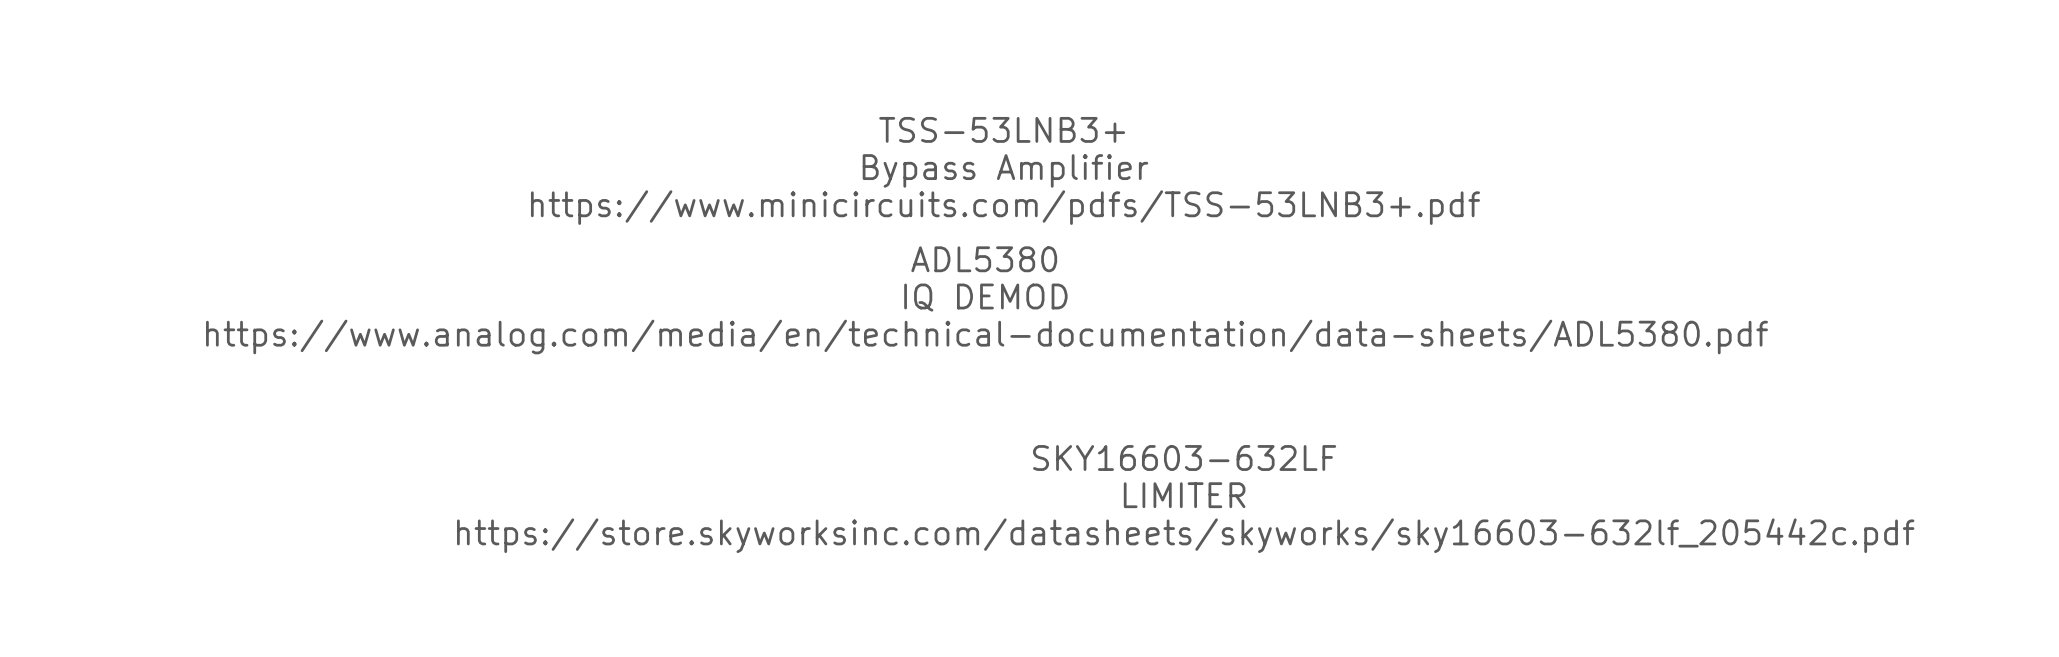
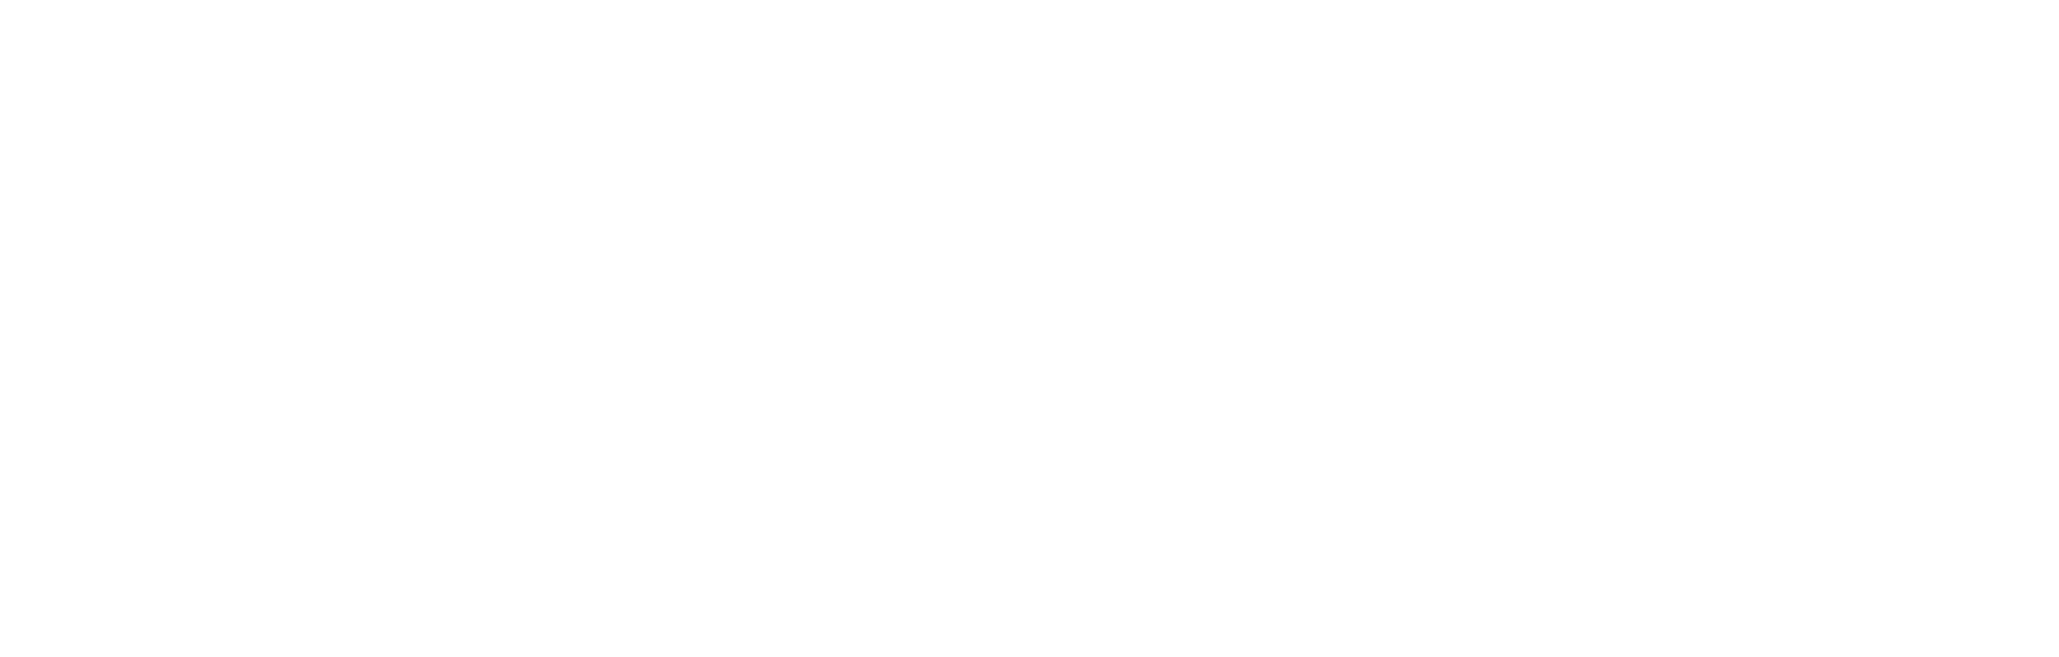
text: TSS-53LNB3+ (1002, 129) -> none
text: Bypass Amplifier (1005, 170) -> none
text: https://www.minicircuits.com/pdfs/TSS-53LNB3+.pdf (1005, 207) -> none
text: ADL5380 (984, 259) -> none
text: IQ DEMOD (985, 297) -> none
text: https://www.analog.com/media/en/technical-documentation/data-sheets/ADL5380.pdf (986, 336) -> none
text: SKY16603-632LF (1184, 458) -> none
text: LIMITER (1184, 495) -> none
text: https://store.skyworksinc.com/datasheets/skyworks/sky16603-632lf_205442c.pdf (1185, 535) -> none

